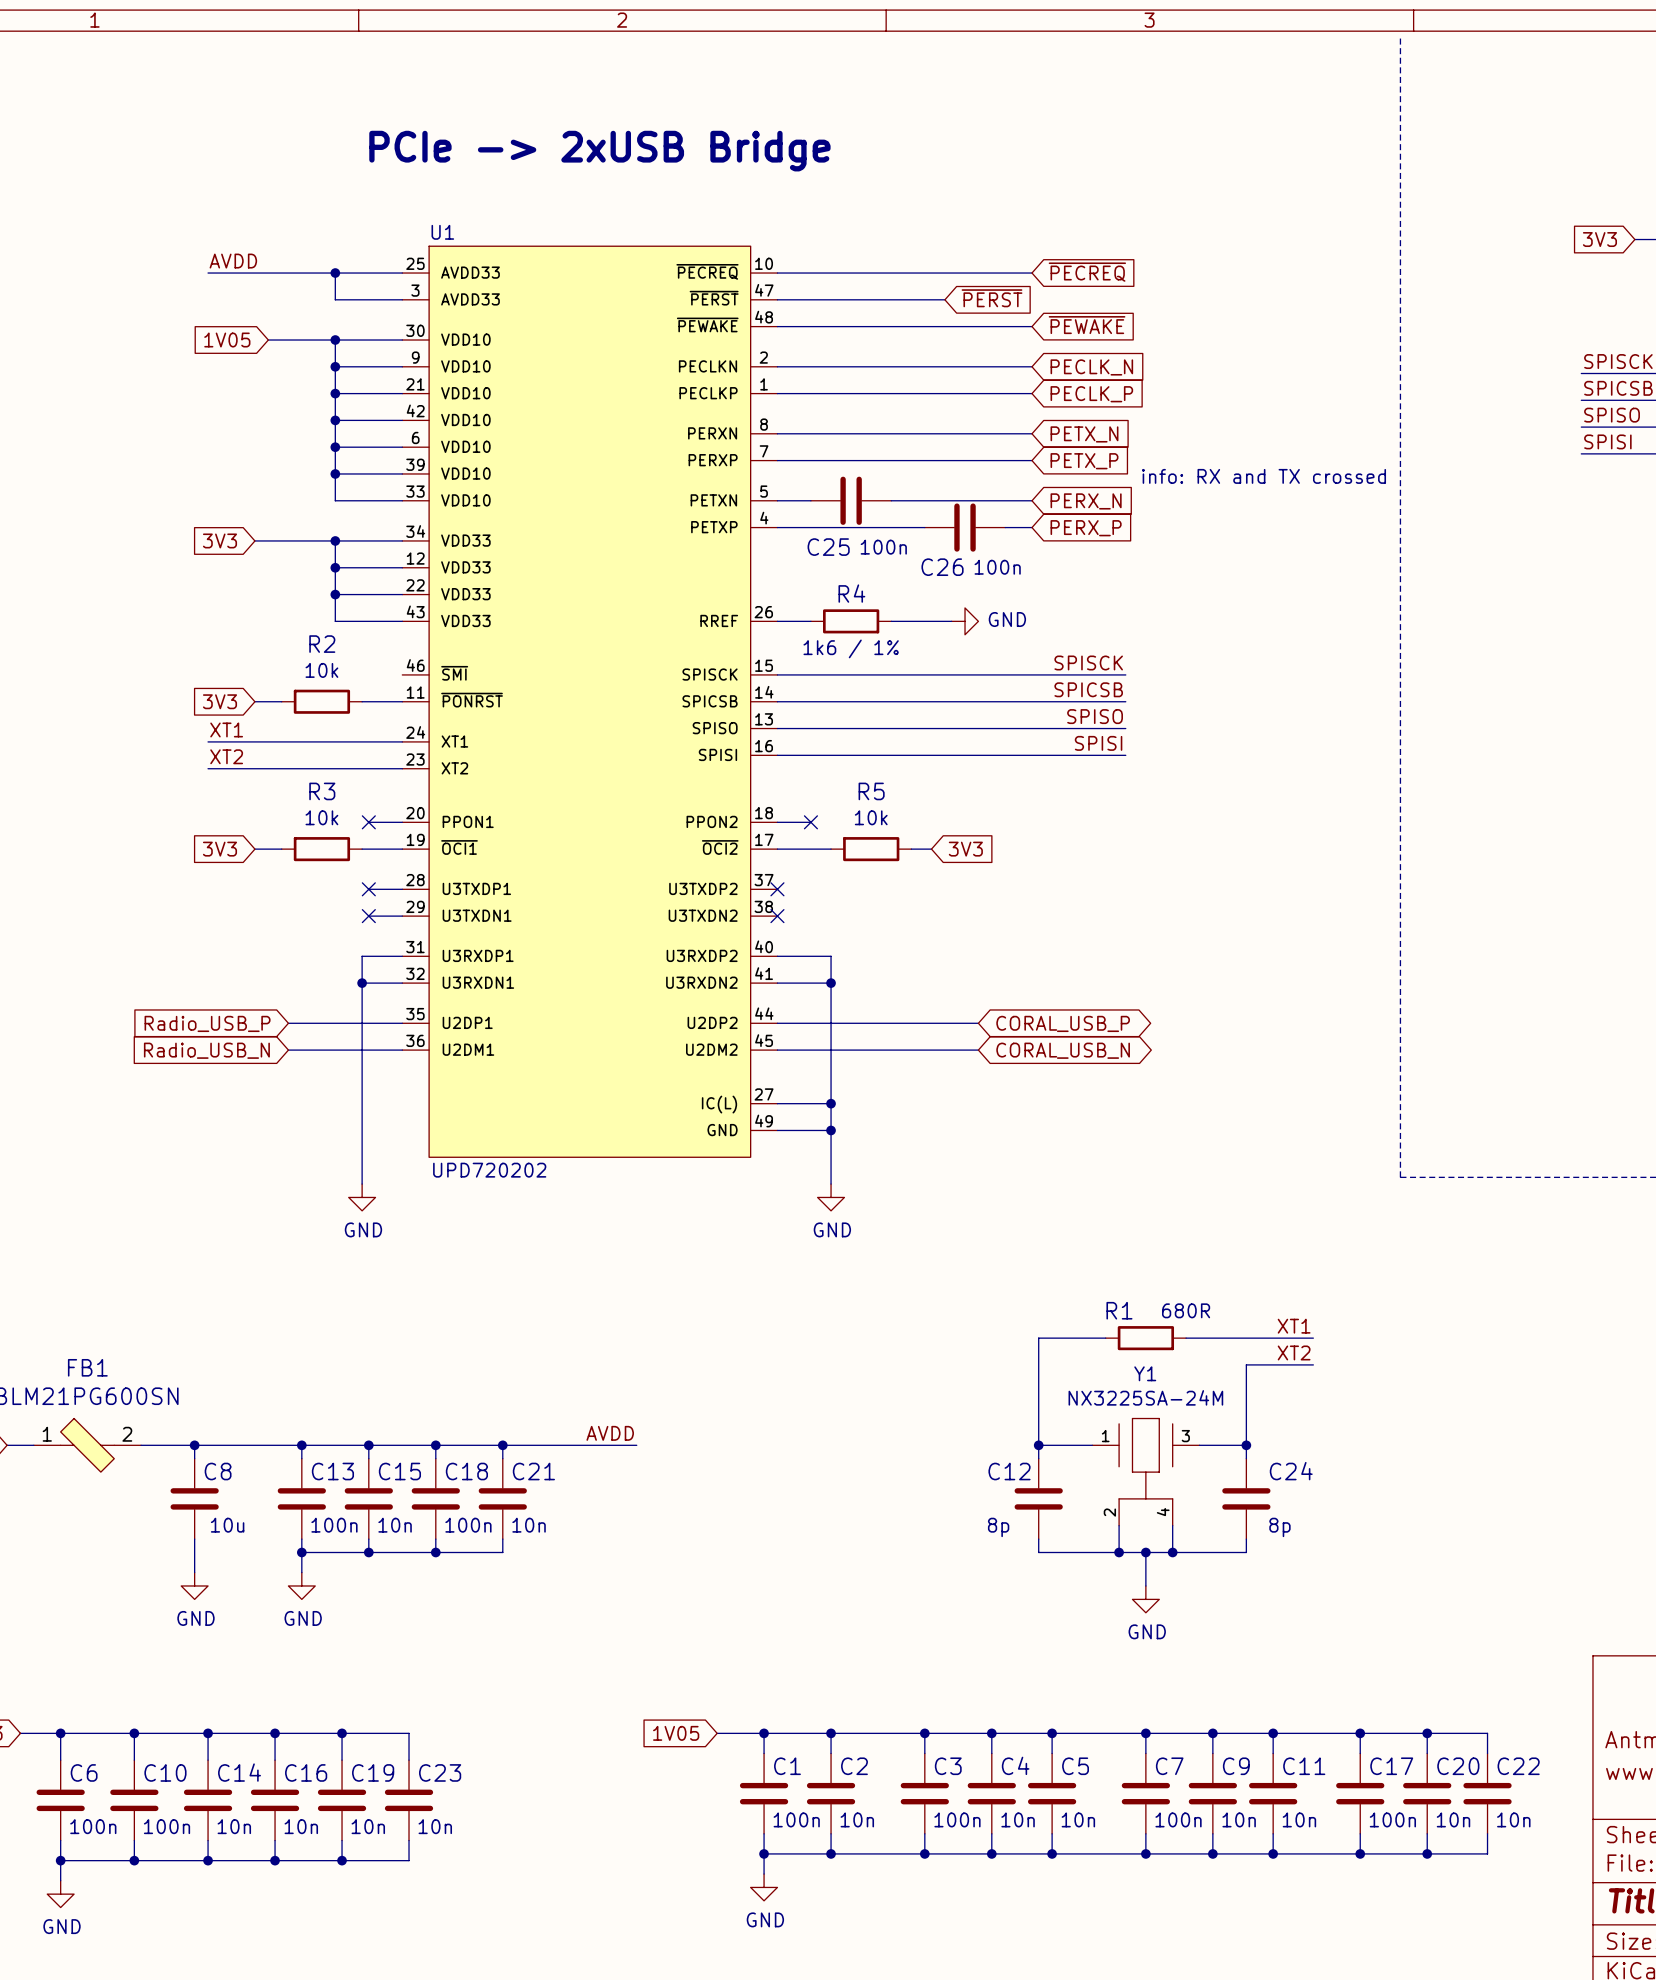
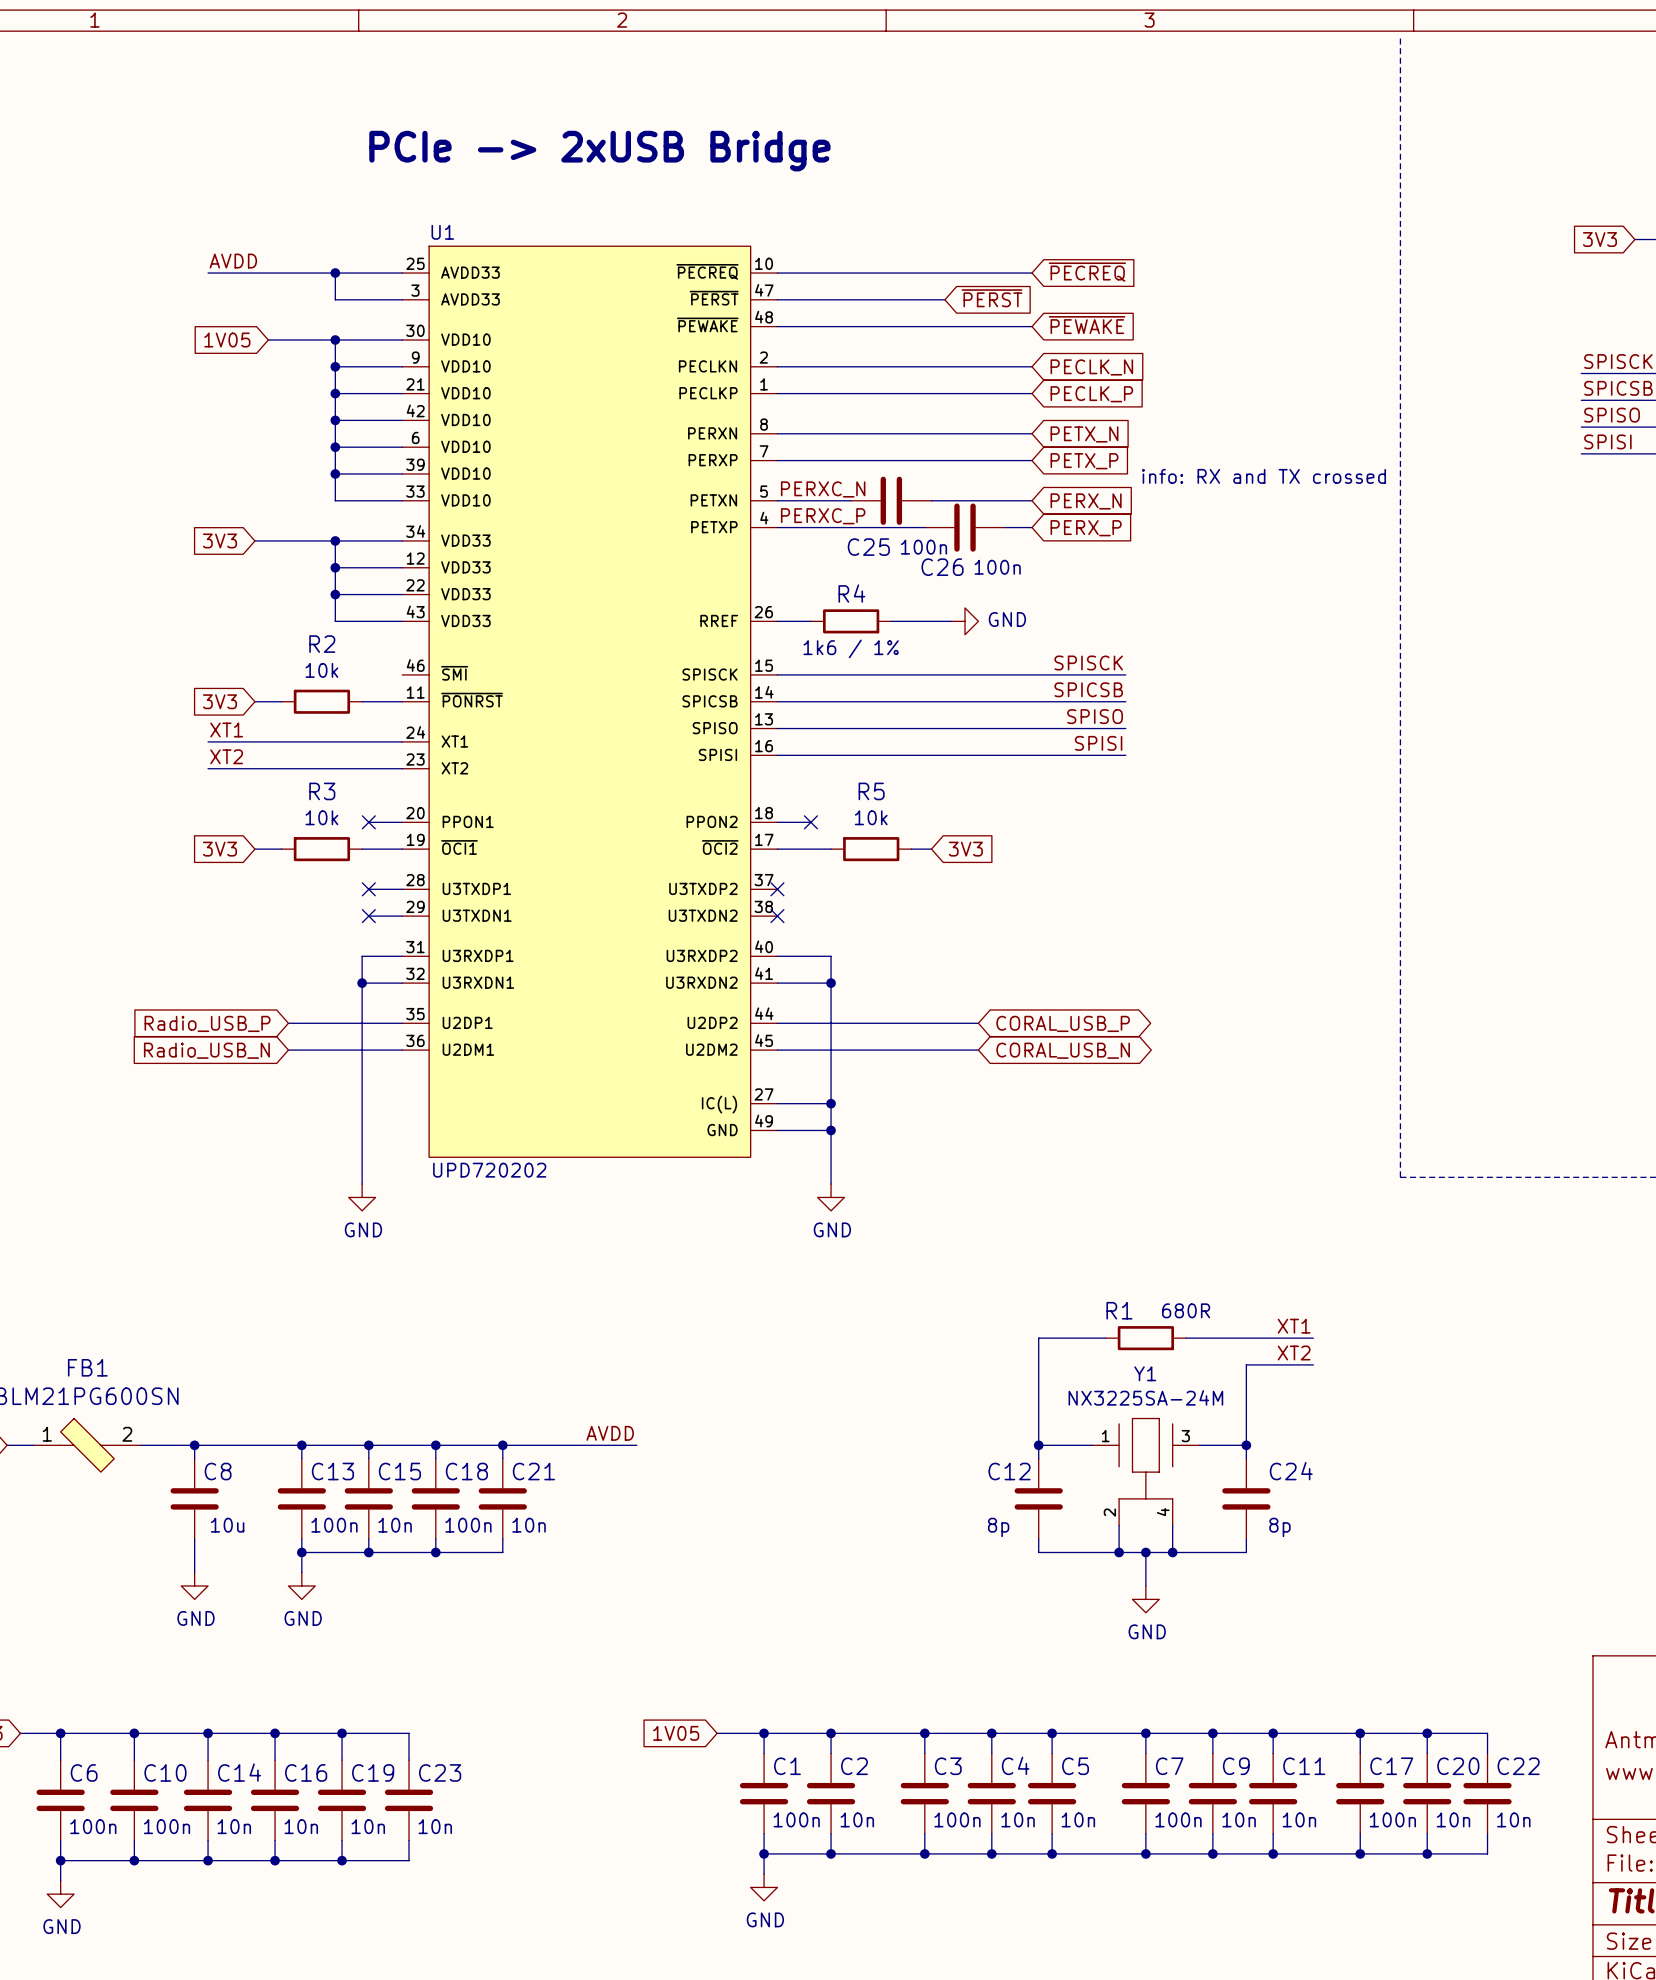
label: none -> PERXC_N (823, 489)
C25 position: (851, 500) -> (891, 500)
label: none -> PERXC_P (823, 516)

